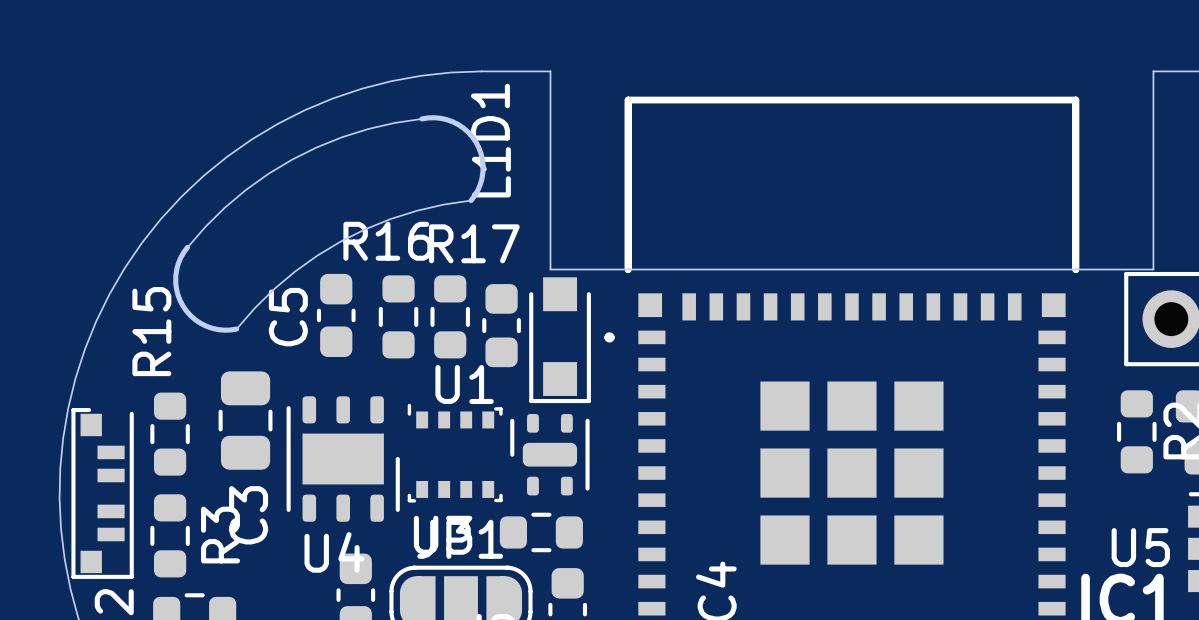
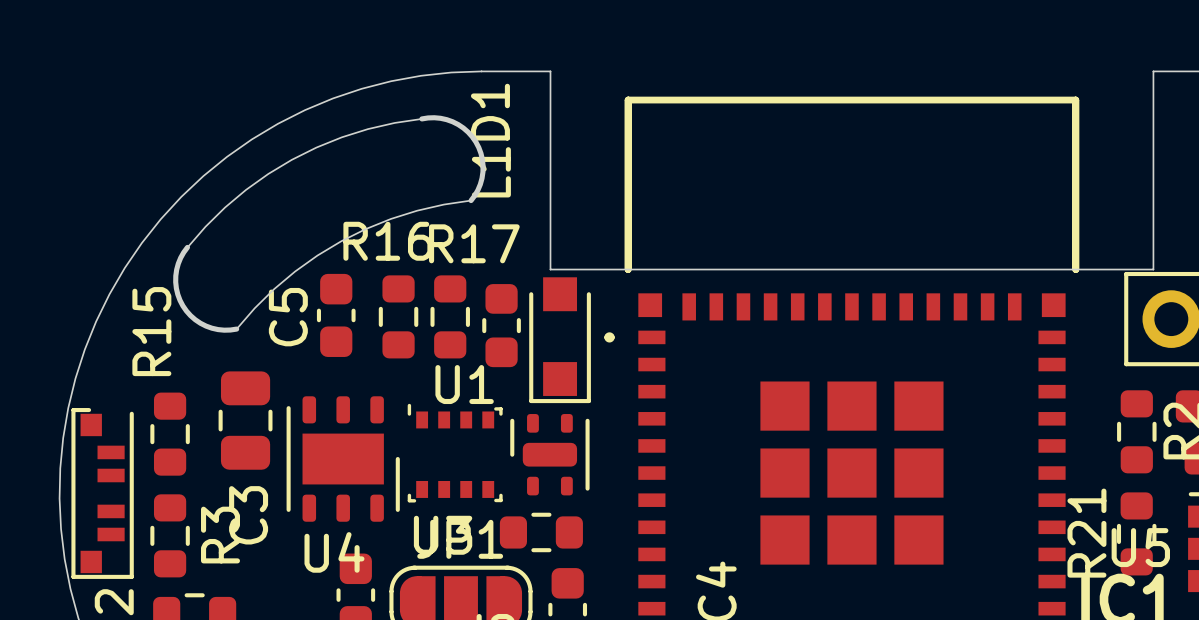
R21: none -> (1136, 533)

